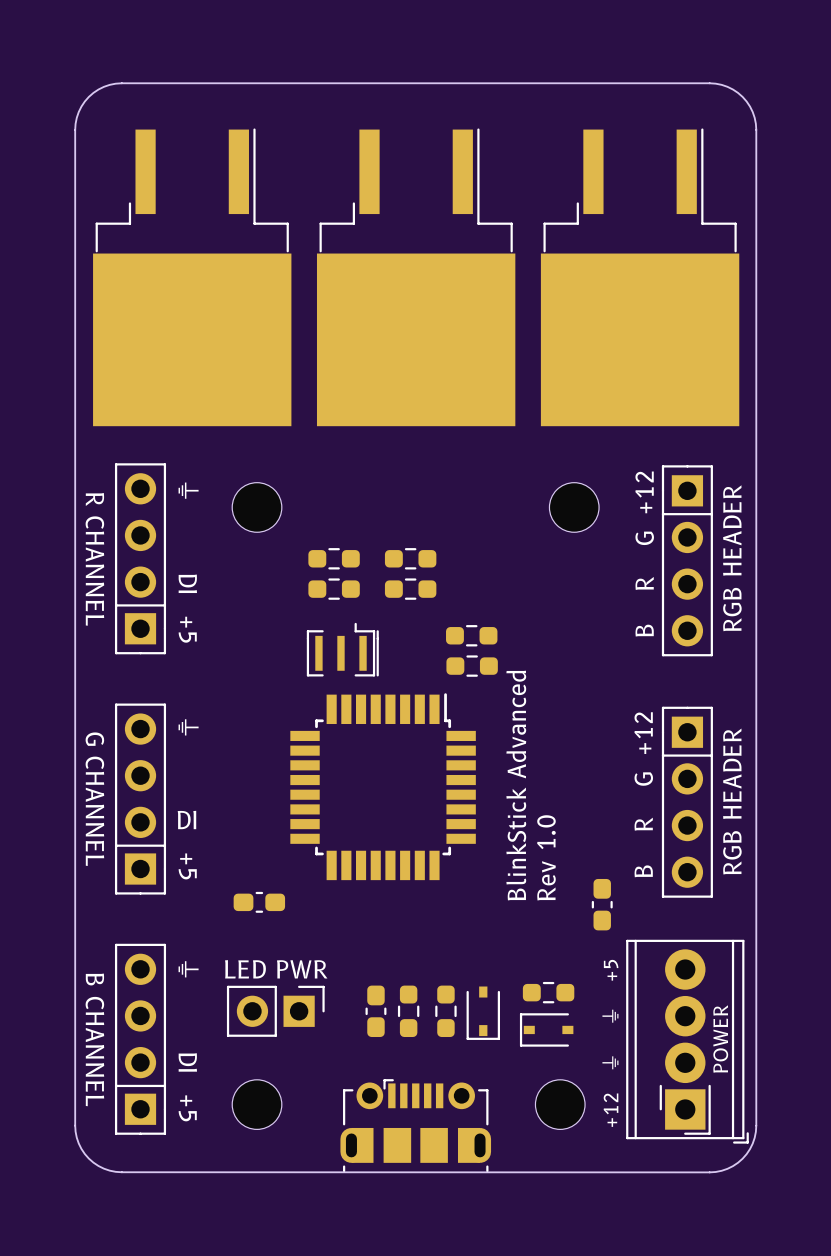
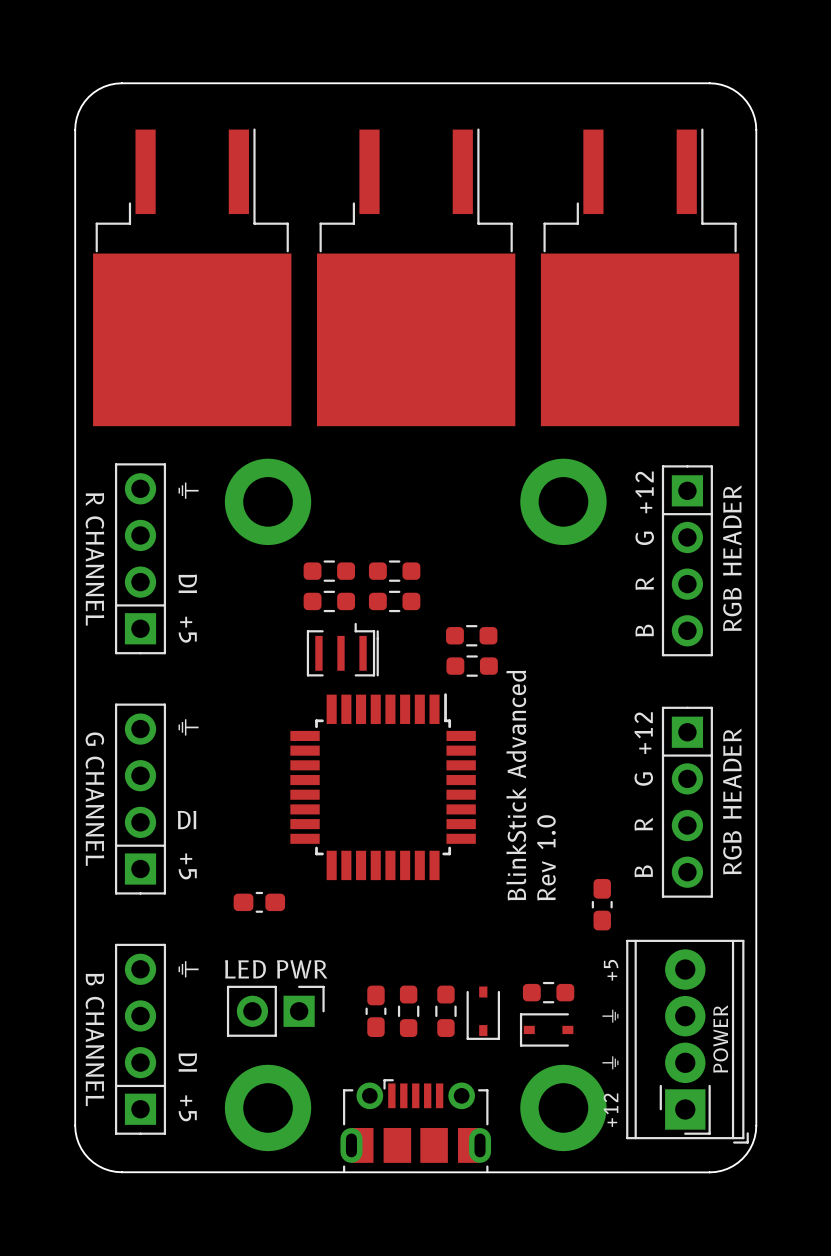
part footprint: [232, 482, 282, 533] -> [224, 458, 312, 546]
part footprint: [549, 482, 600, 533] -> [520, 458, 607, 546]
part: (334, 558) -> none
part: (410, 558) -> none
part: none -> (329, 571)
part: none -> (394, 571)
part: (334, 589) -> none
part: (410, 589) -> none
part: none -> (329, 601)
part: none -> (394, 601)
part footprint: [232, 1079, 282, 1130] -> [224, 1064, 312, 1152]
part footprint: [535, 1079, 586, 1130] -> [520, 1064, 607, 1152]

